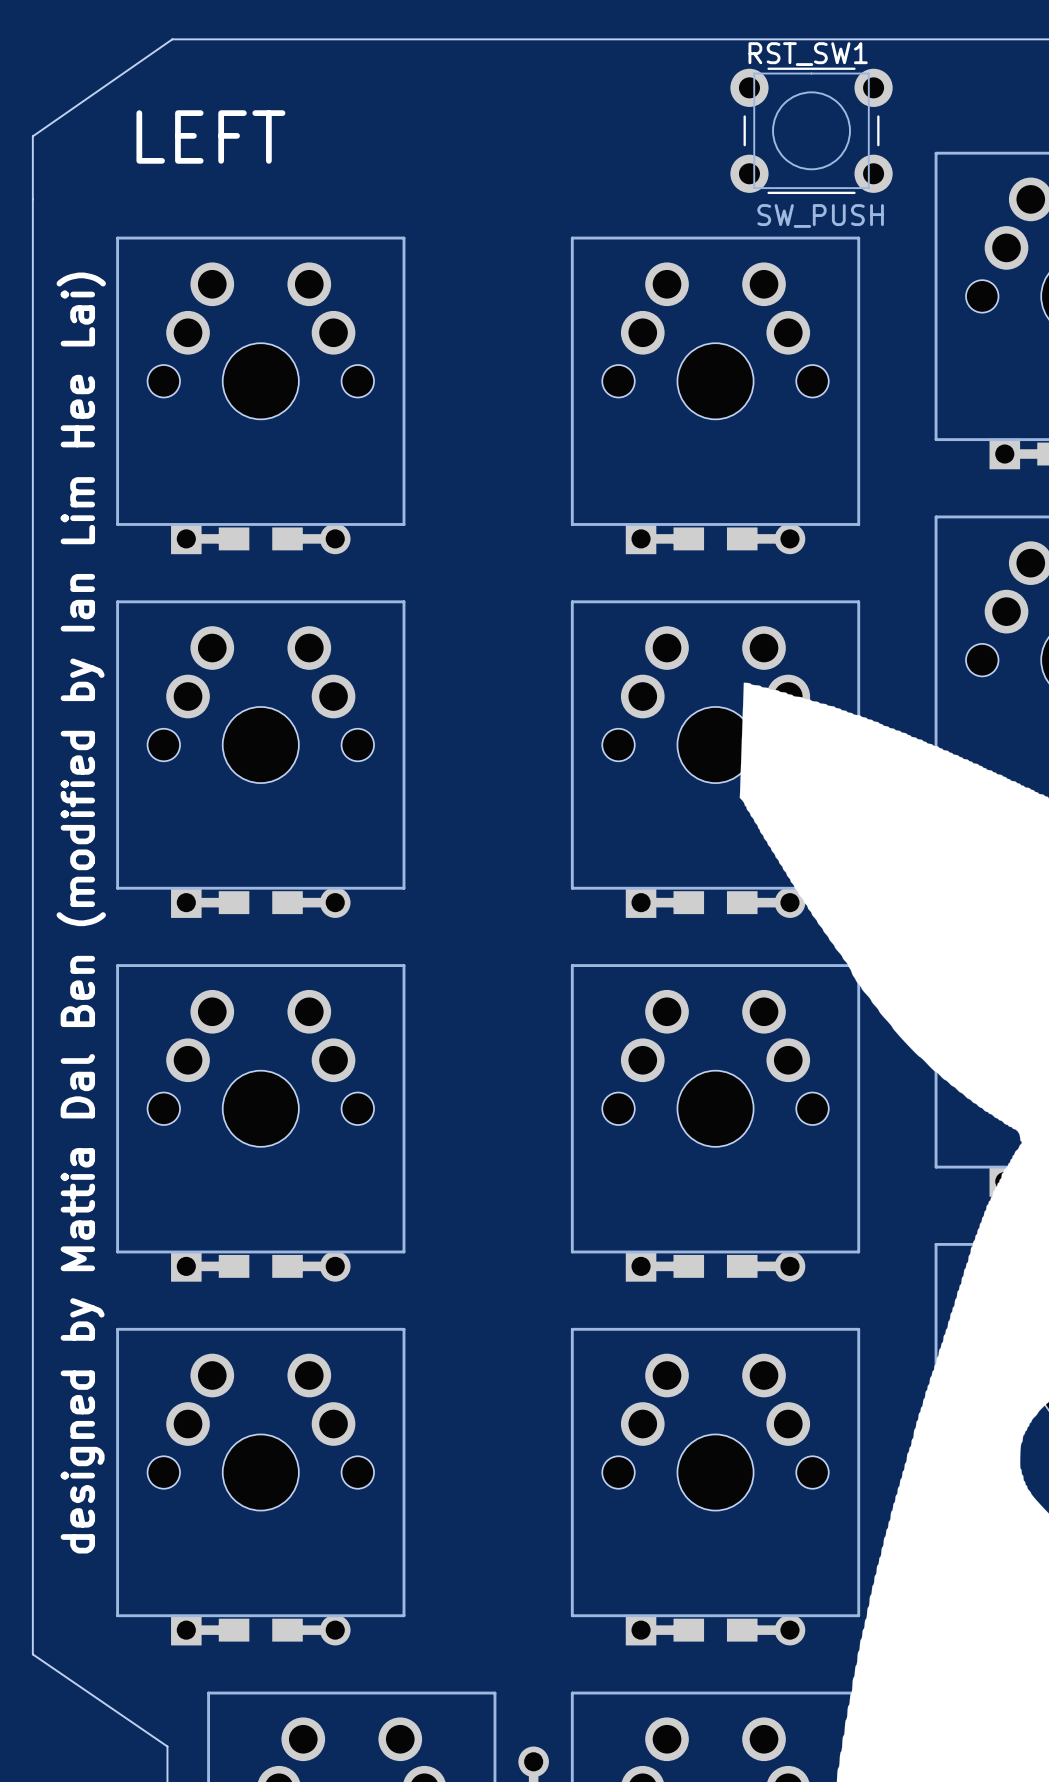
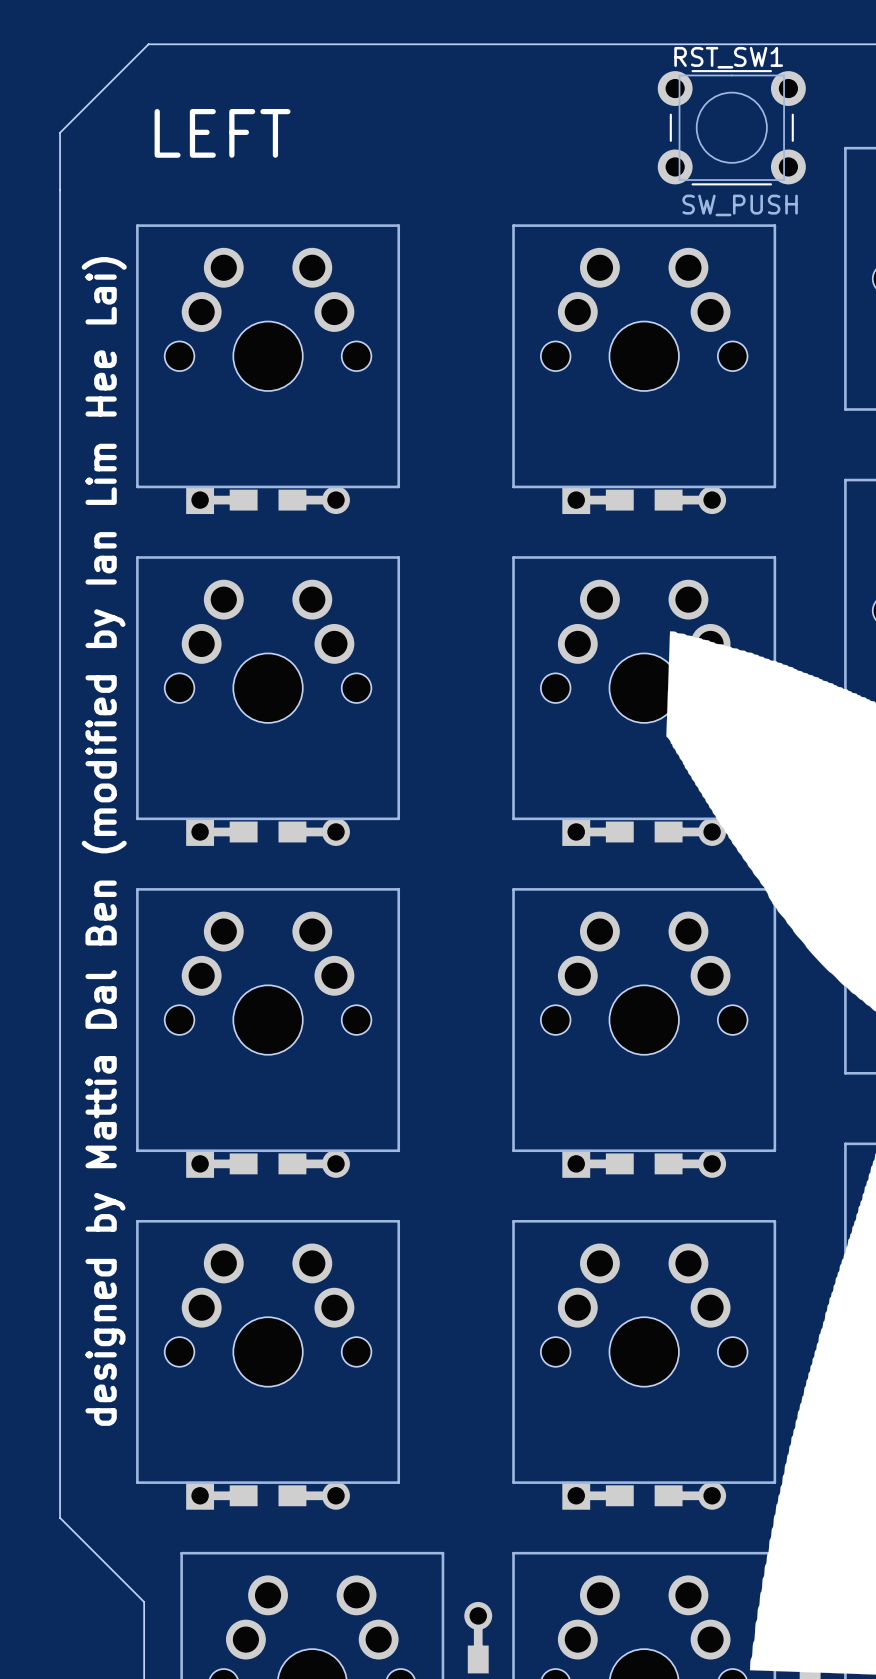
board edge: (172, 39) (32, 136) (32, 1654) (167, 1746) -> (148, 44) (60, 132) (60, 1517) (144, 1601)
text position: LEFT (210, 136) -> LEFT (222, 133)
part position: (260, 381) -> (268, 356)
part position: (260, 538) -> (268, 500)
part position: (260, 745) -> (268, 688)
part position: (260, 902) -> (268, 831)
text position: designed by Mattia Dal Ben (modified by Ian Lim Hee Lai) (81, 913) -> designed by Mattia Dal Ben (modified by Ian Lim Hee Lai) (104, 841)
part position: (260, 1108) -> (268, 1020)
part position: (260, 1266) -> (268, 1163)
part position: (260, 1472) -> (268, 1351)
part position: (260, 1630) -> (268, 1495)

